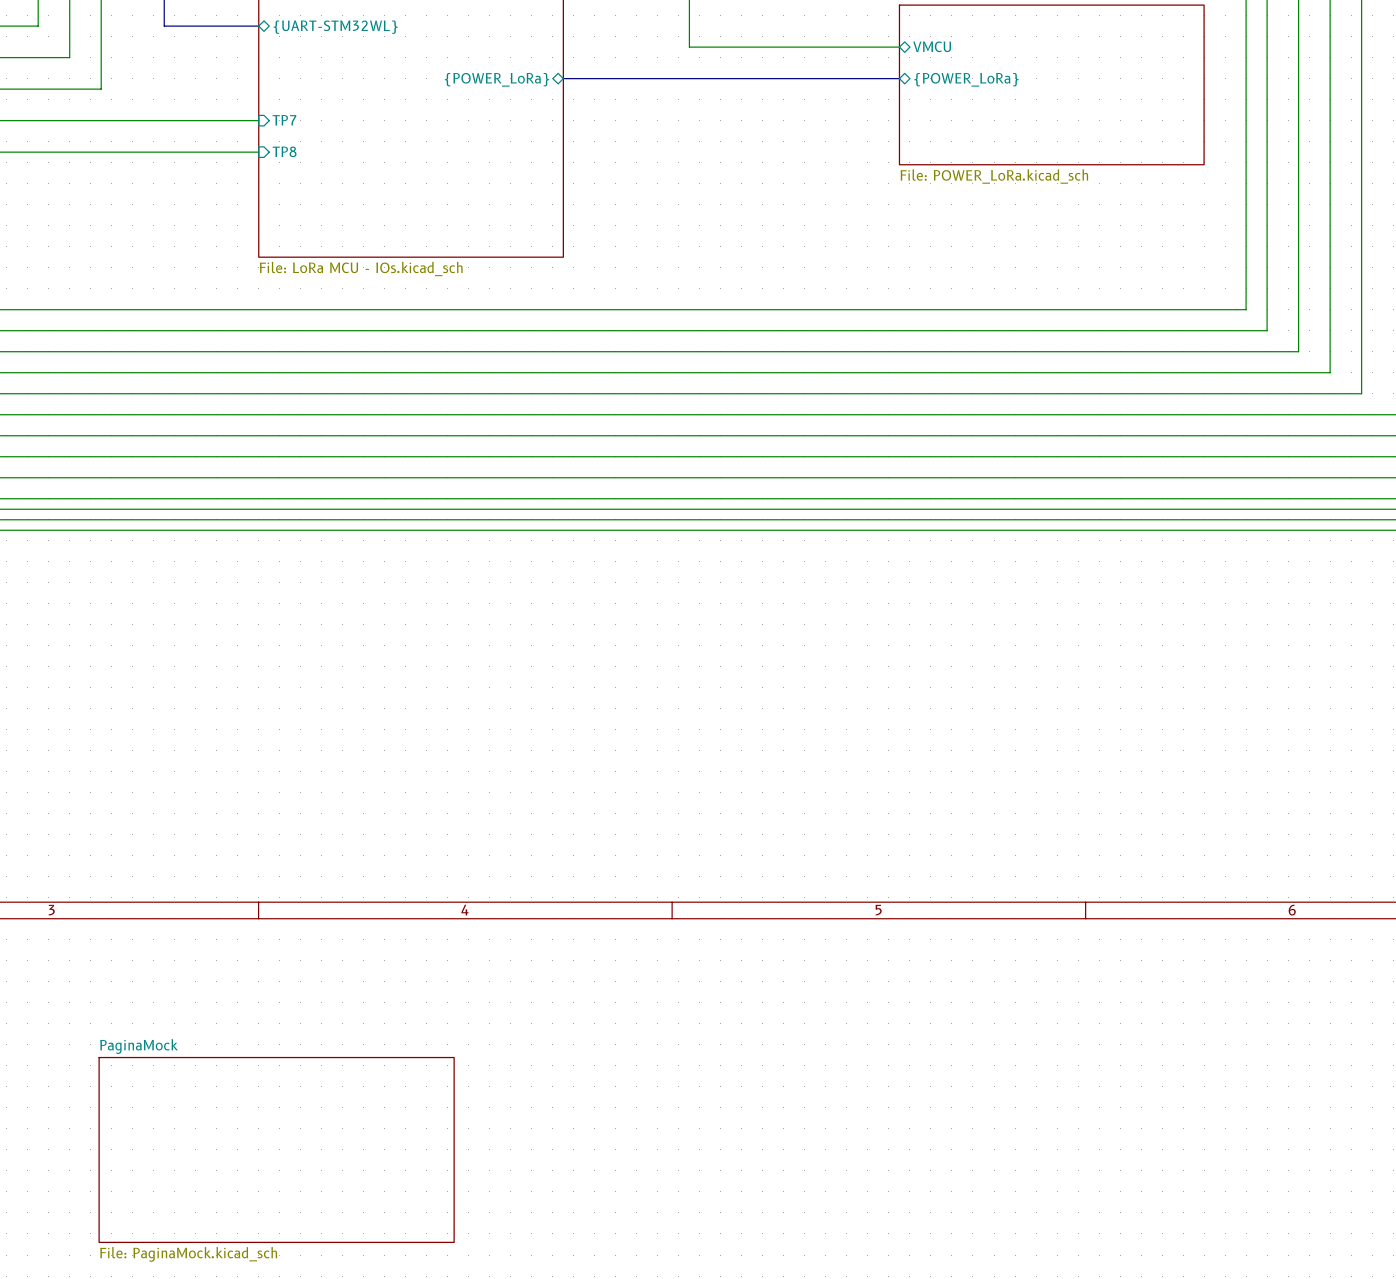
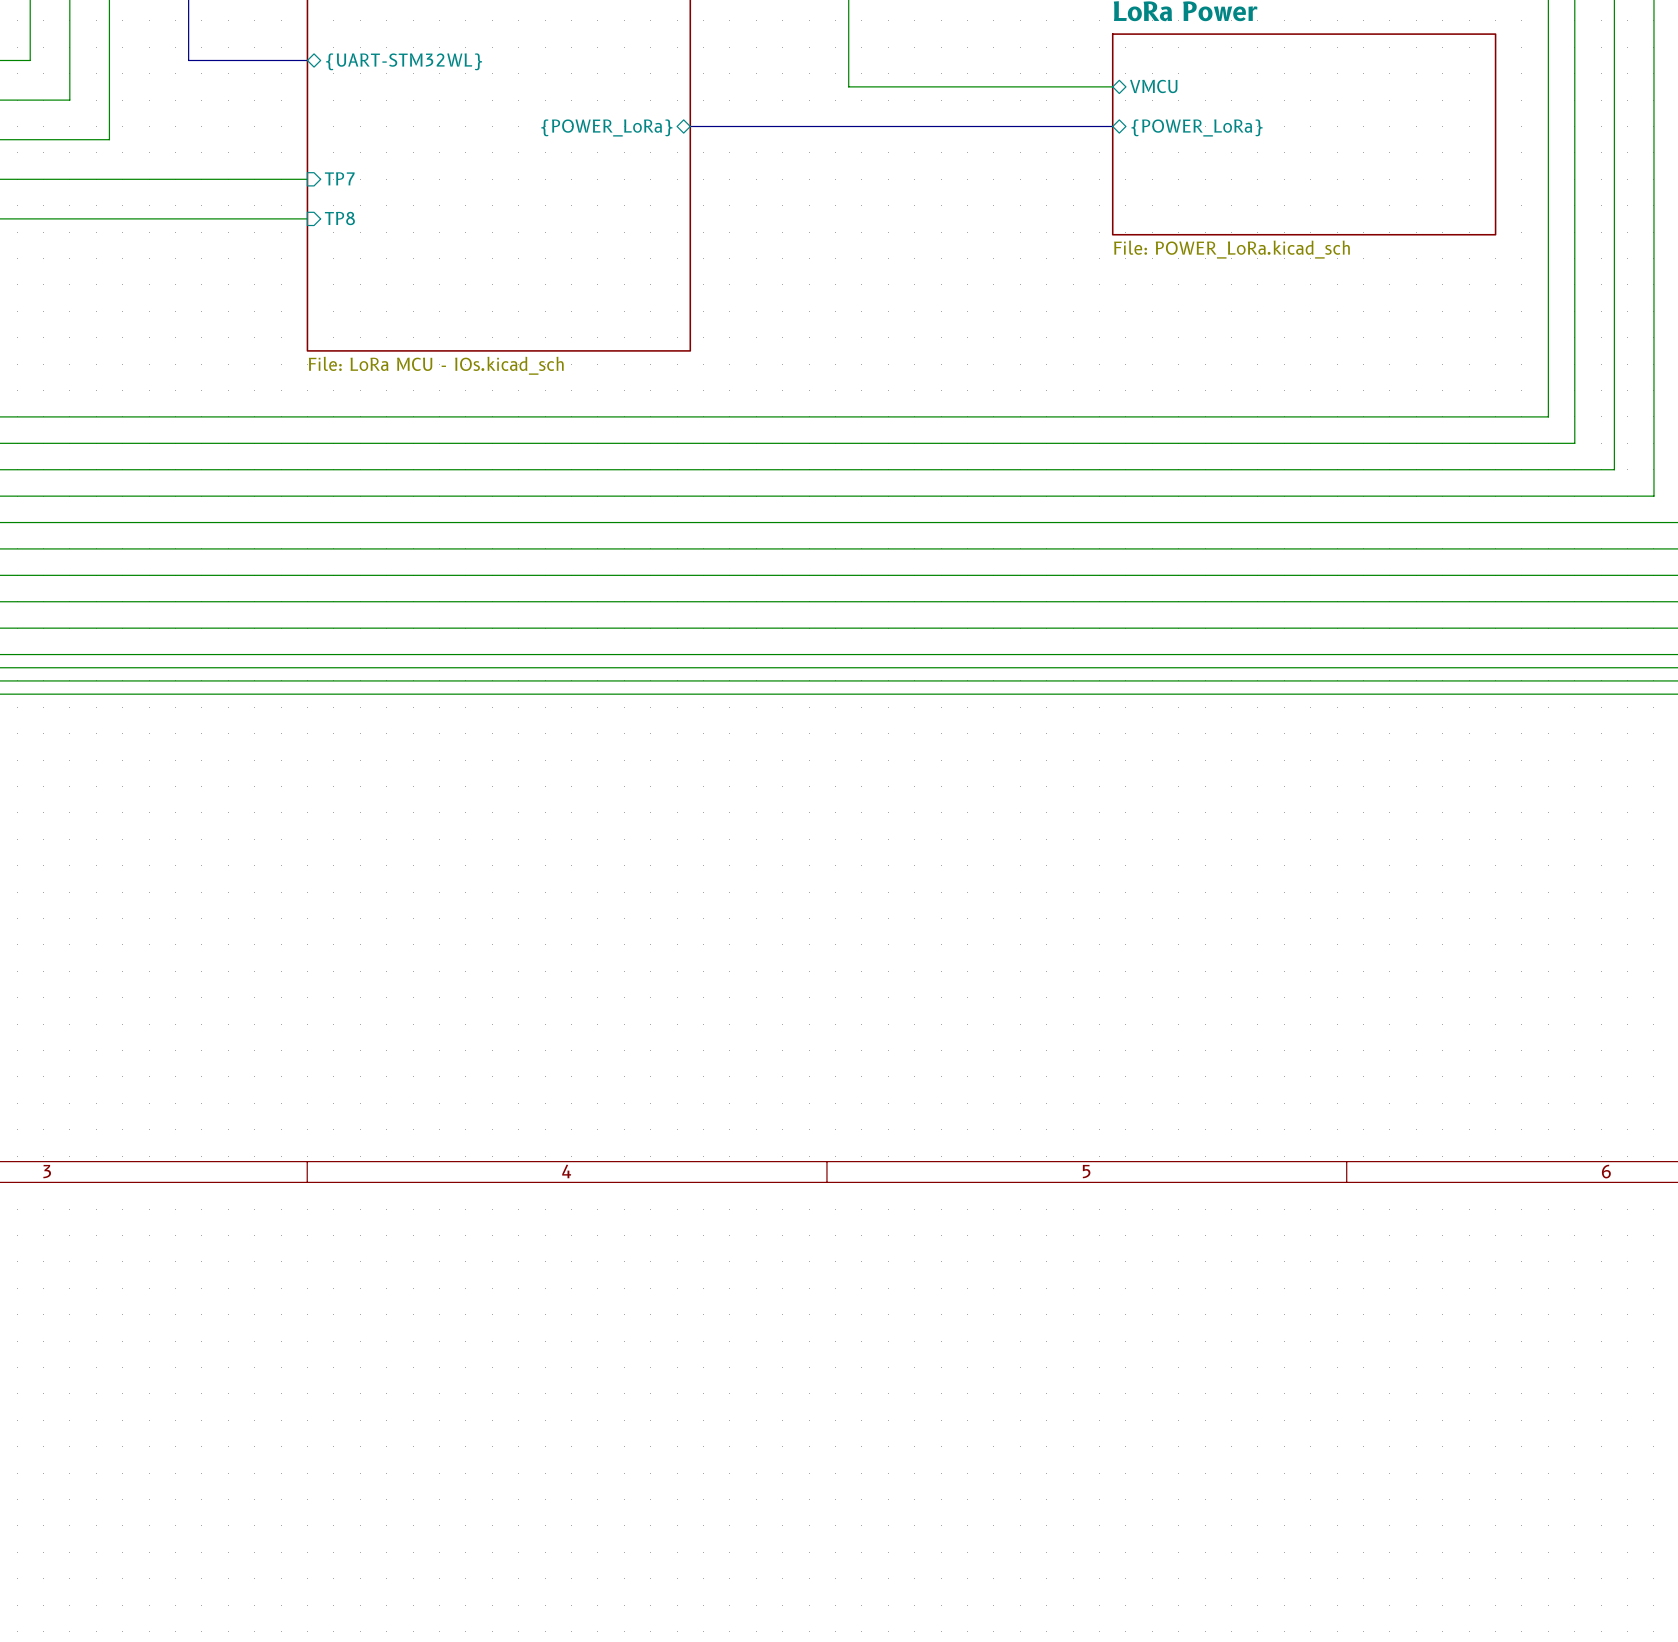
sheet PaginaMock: File: PaginaMock.kicad_sch (276, 1149) -> none

